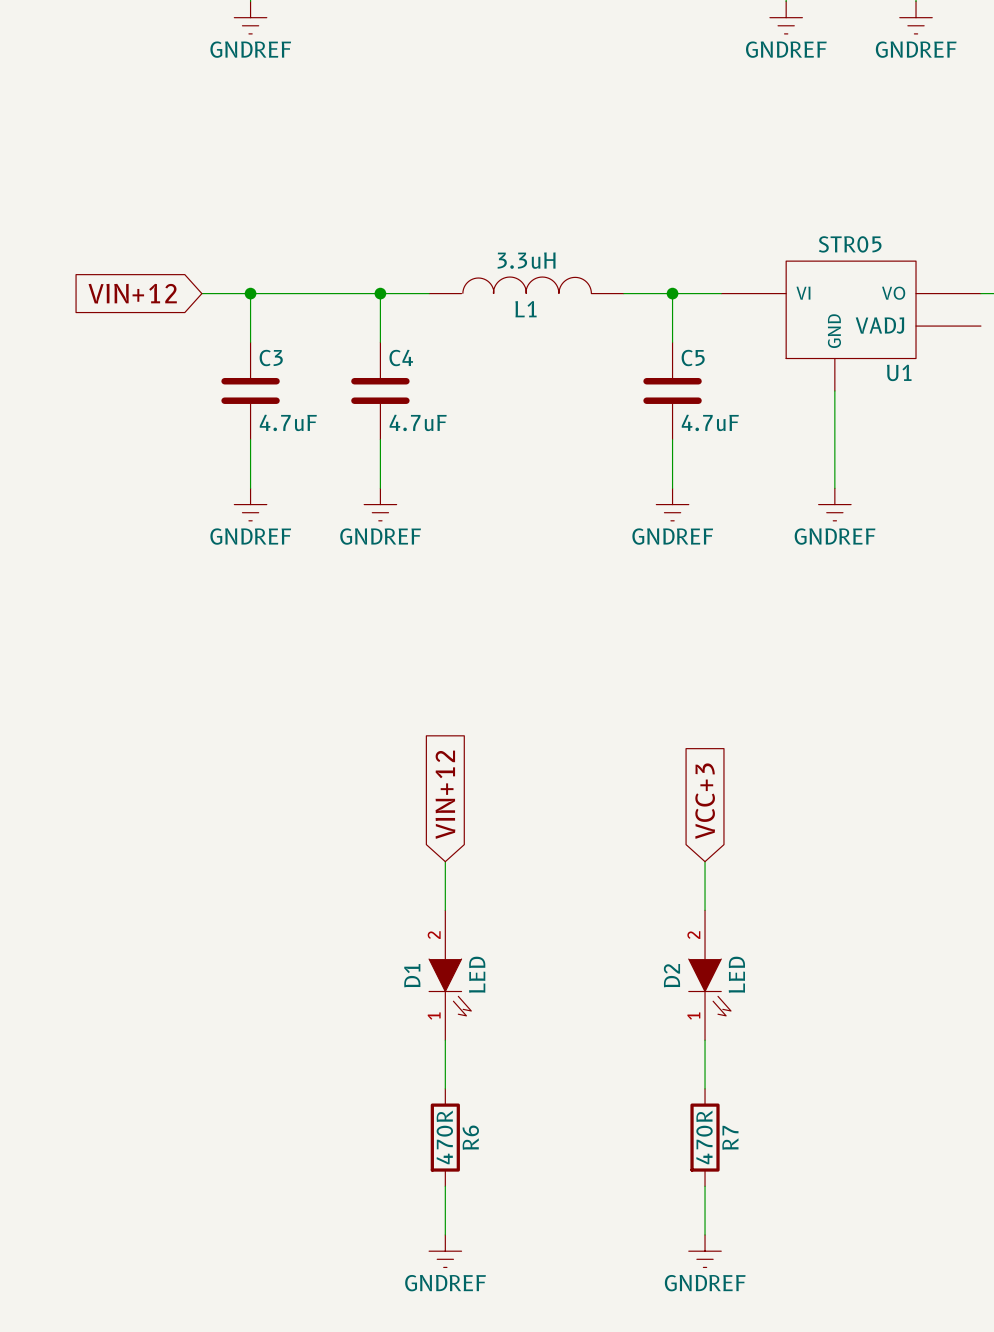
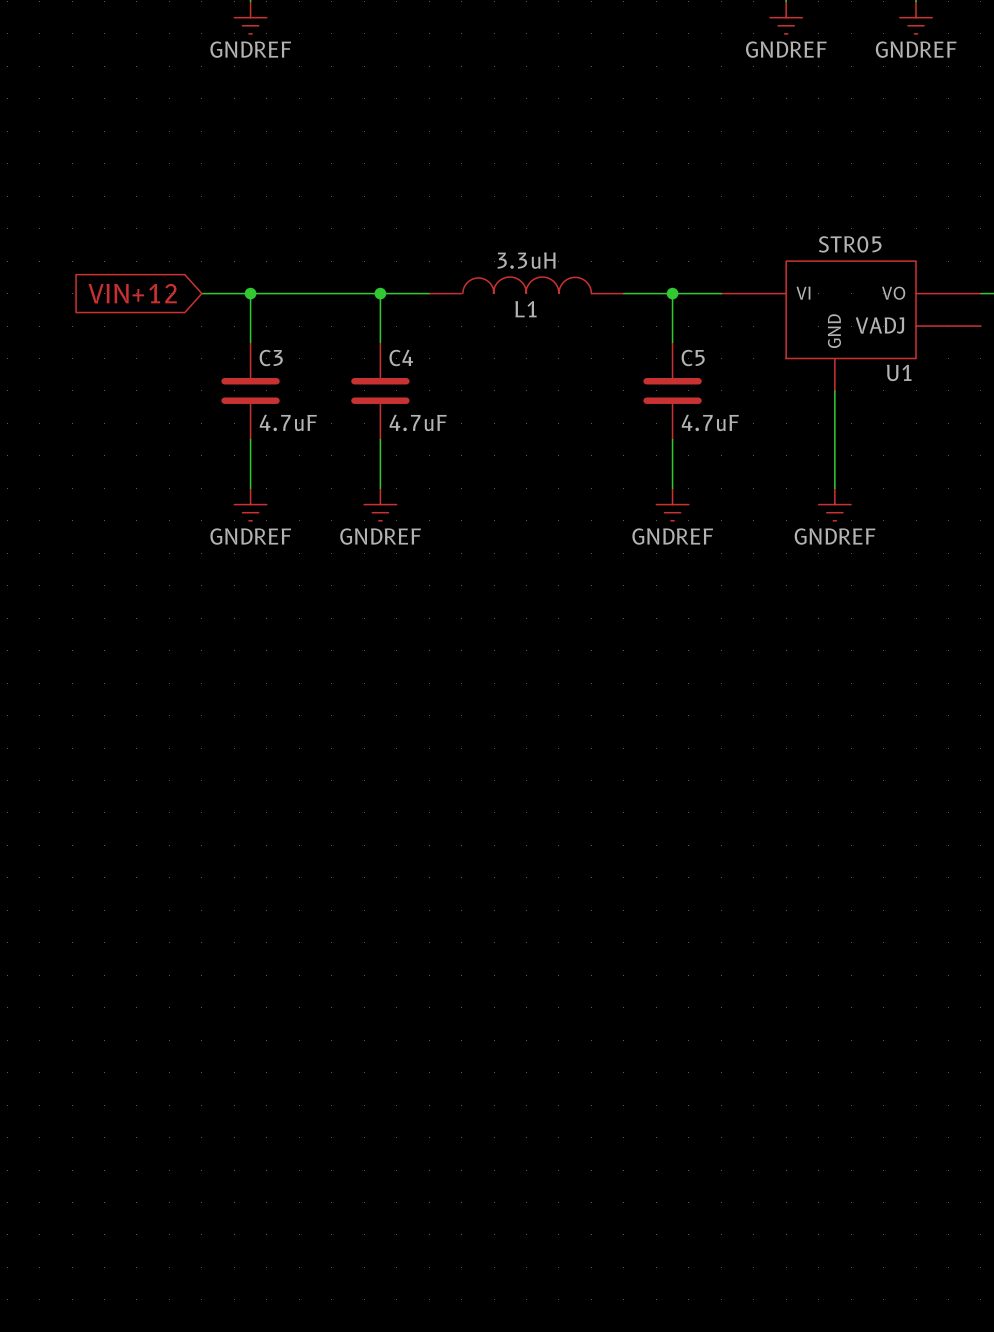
global label: VIN+12 (445, 794) -> none
global label: VCC+3 (705, 801) -> none
wire: (445, 861) (445, 910) -> none
wire: (705, 861) (705, 910) -> none
D1: LED (450, 975) -> none
D2: LED (709, 975) -> none
wire: (445, 1040) (445, 1088) -> none
wire: (705, 1040) (705, 1088) -> none
R6: 470R (445, 1137) -> none
R7: 470R (705, 1137) -> none
wire: (445, 1186) (445, 1234) -> none
wire: (705, 1186) (705, 1234) -> none
power symbol: GNDREF (445, 1251) -> none
power symbol: GNDREF (705, 1251) -> none

